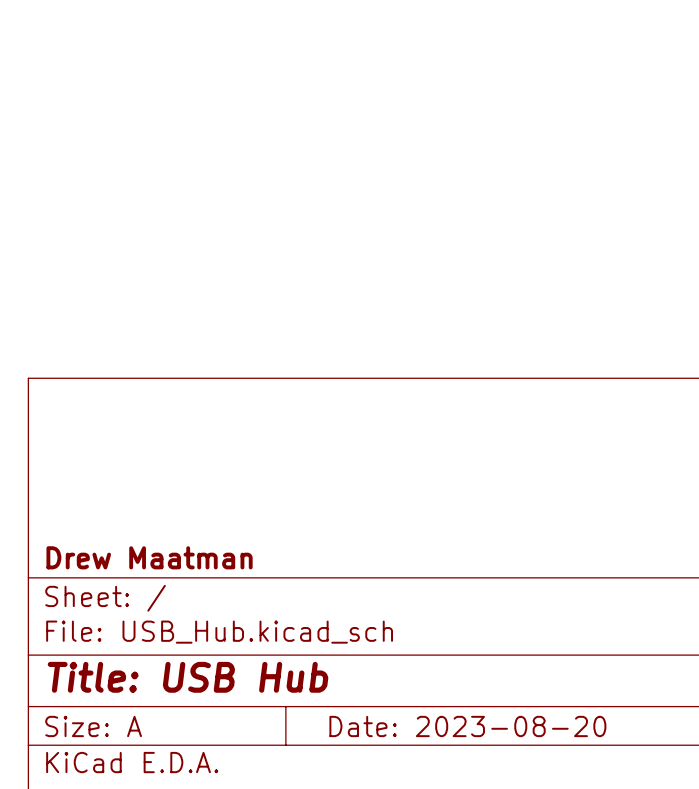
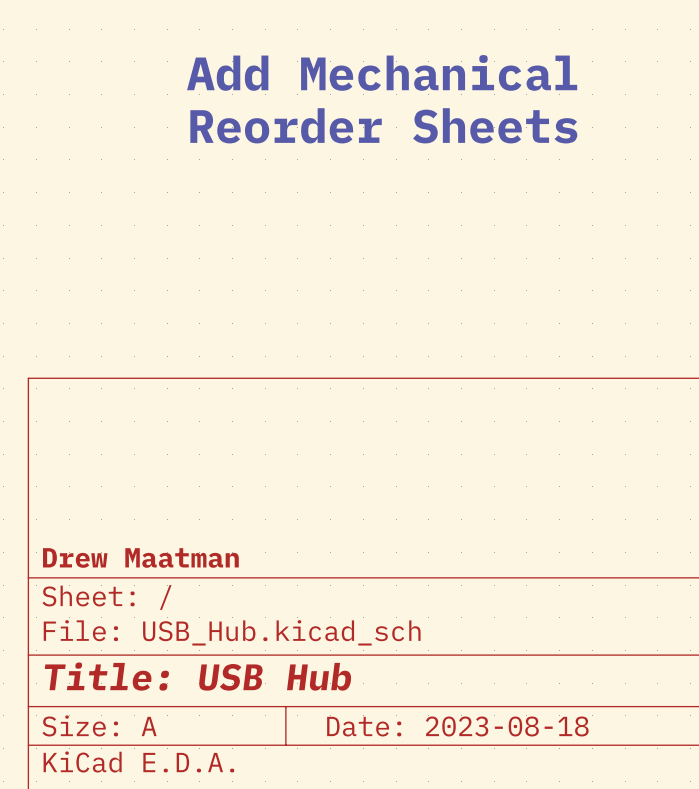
text: none -> Add Mechanical (382, 72)
text: none -> Reorder Sheets (383, 125)
title block: Date: 2023-08-20 (467, 726) -> Date: 2023-08-18 (457, 726)

